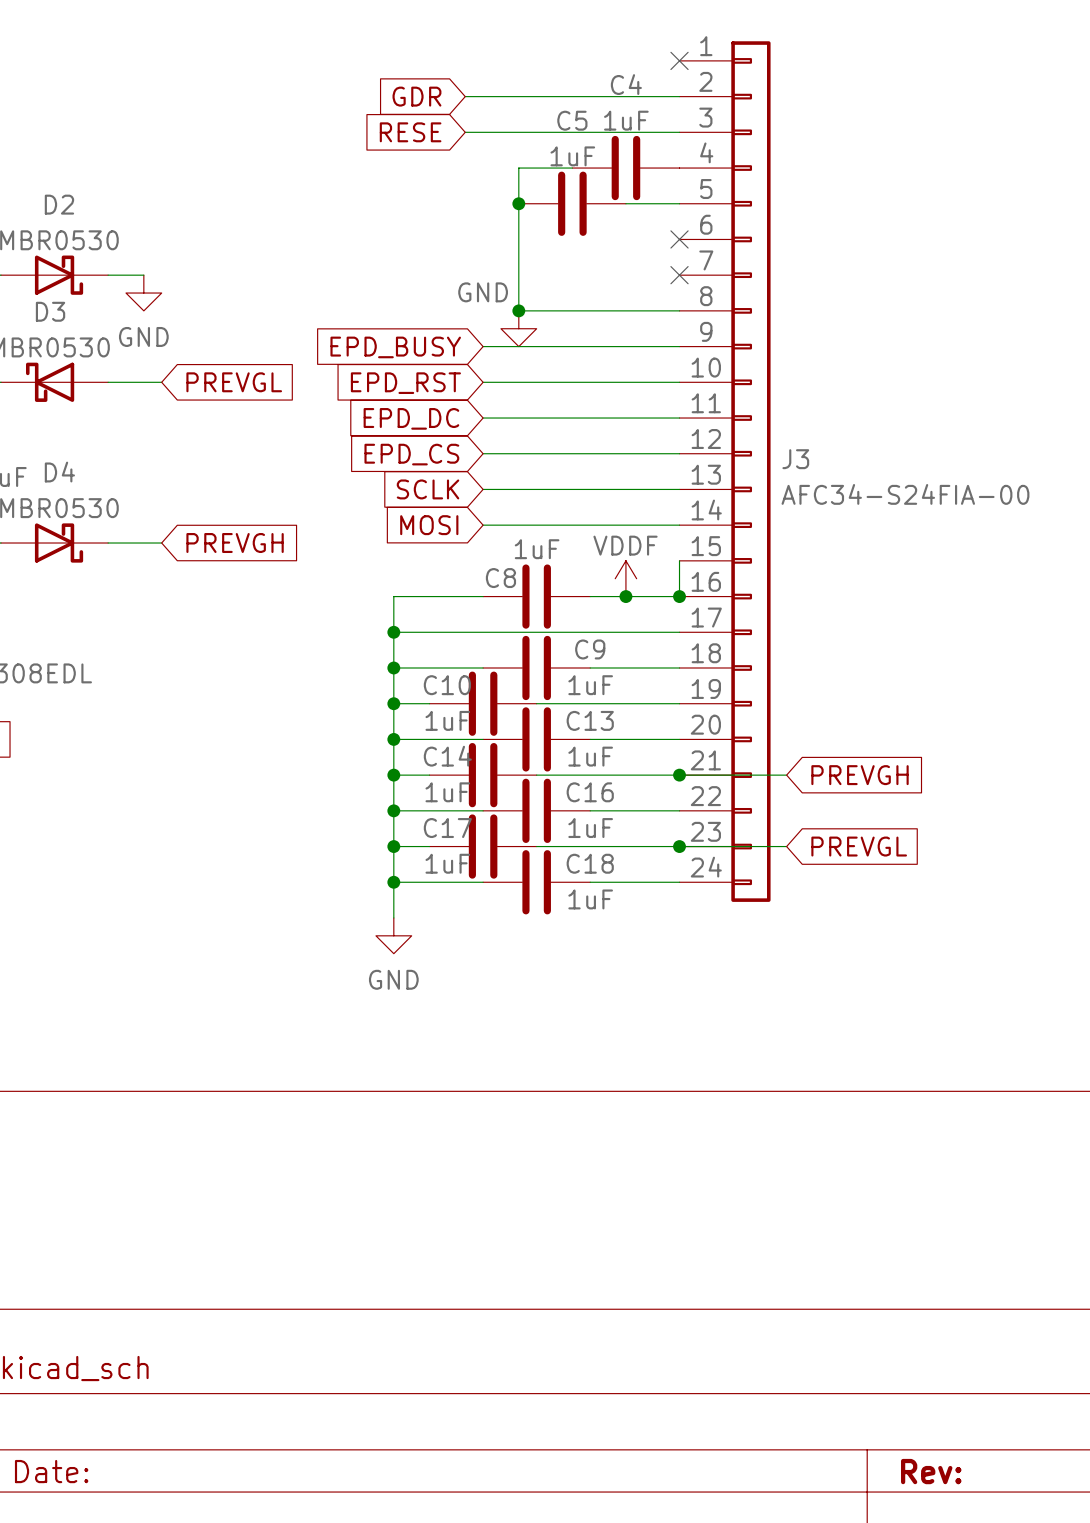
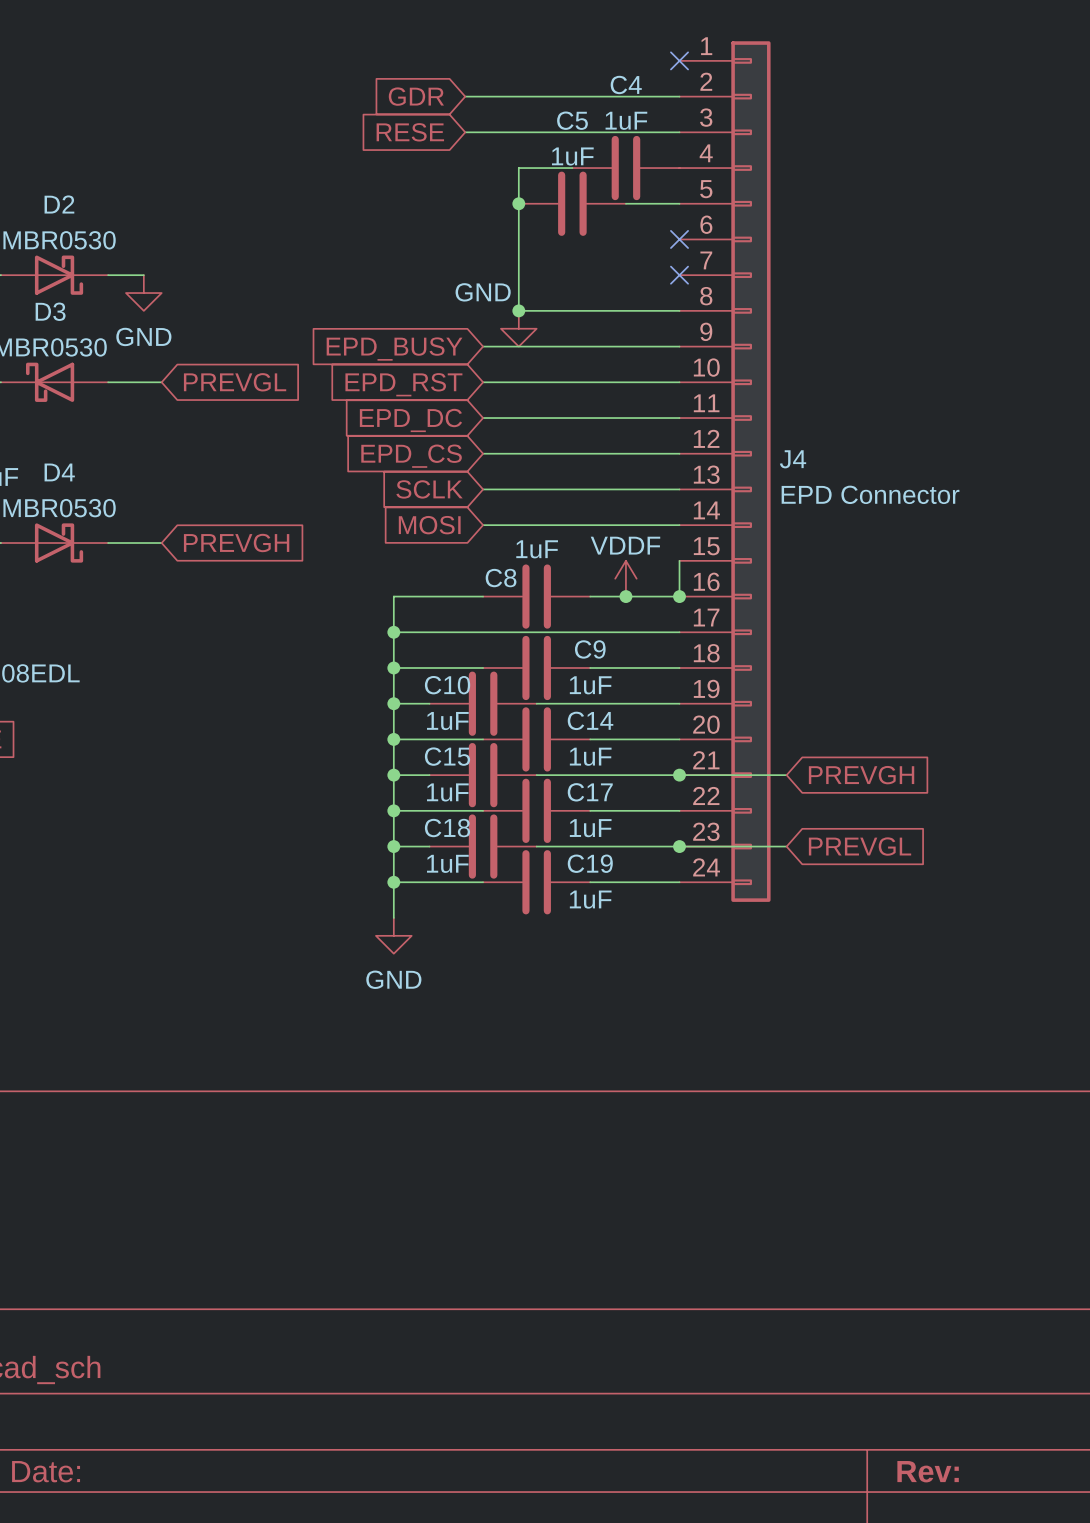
J3 name: J3 (795, 459) -> J4 (793, 459)
J3 value: AFC34-S24FIA-00 (905, 494) -> EPD Connector (870, 494)
C13 name: C13 (590, 720) -> C14 (590, 720)
C14 name: C14 (447, 756) -> C15 (447, 756)
C16 name: C16 (590, 792) -> C17 (590, 792)
C17 name: C17 (447, 828) -> C18 (447, 828)
C18 name: C18 (590, 863) -> C19 (590, 863)

